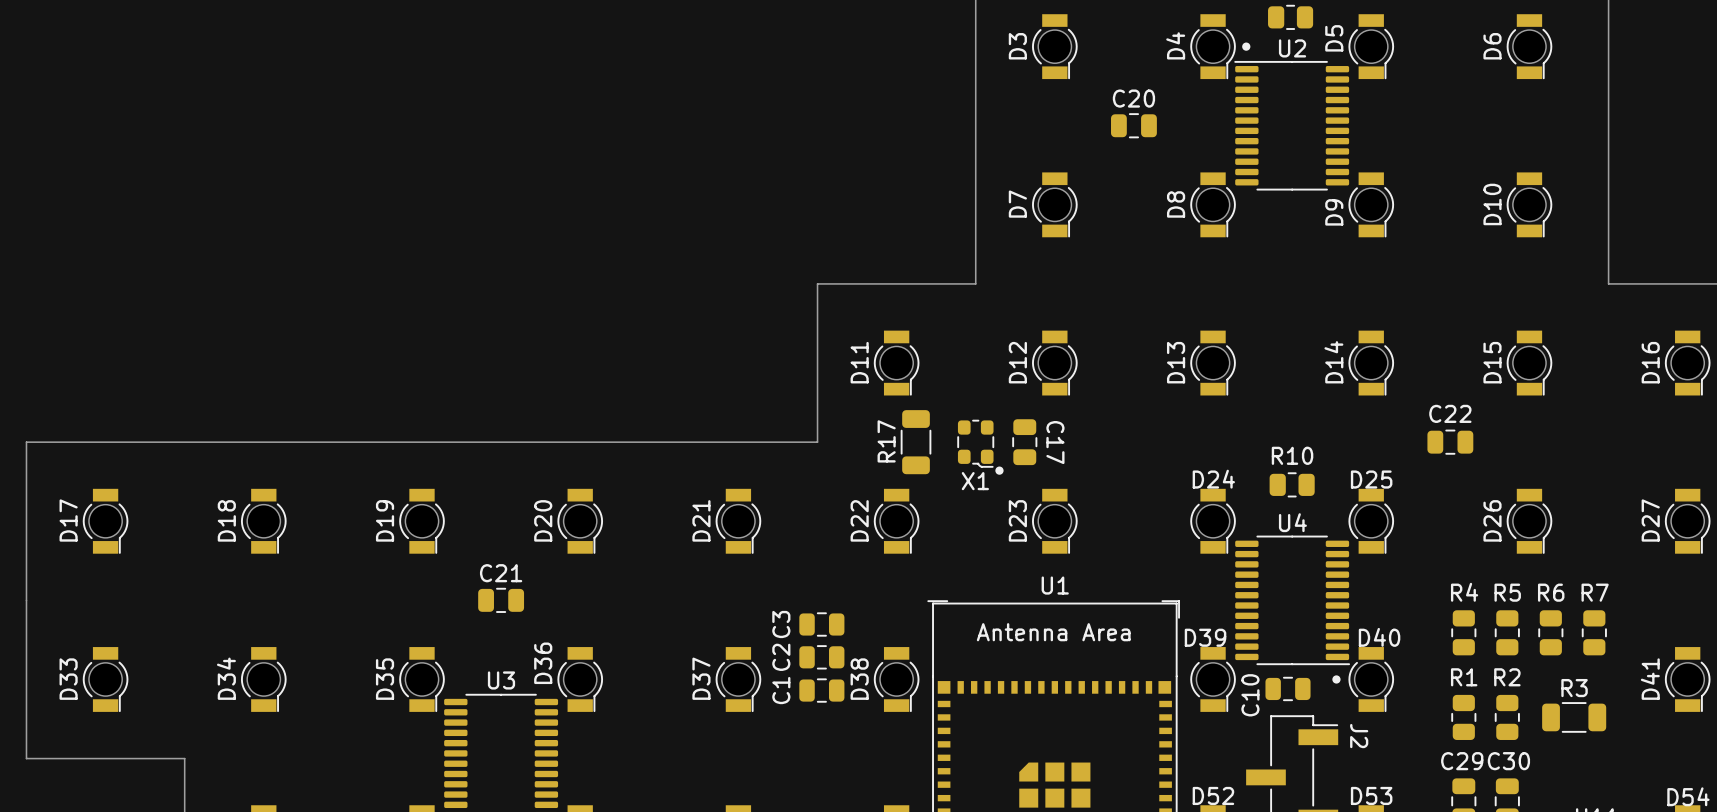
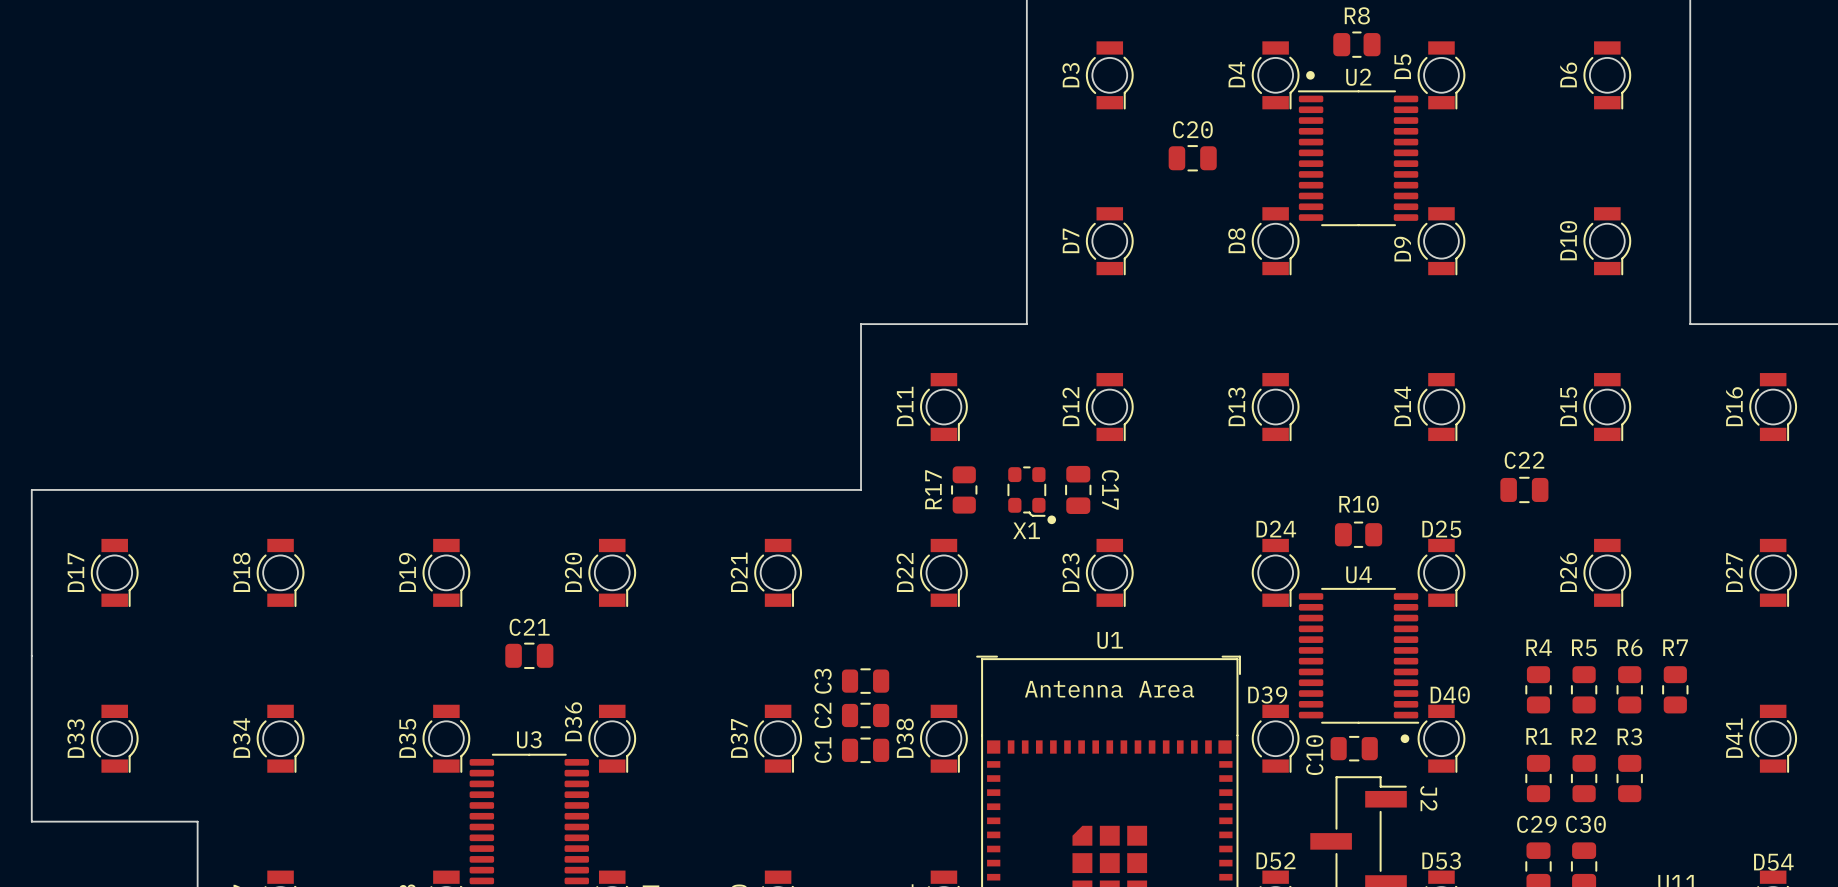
R17 footprint: [900, 410, 932, 475] -> [951, 466, 978, 514]
R3 footprint: [1542, 702, 1607, 733] -> [1616, 754, 1643, 803]

